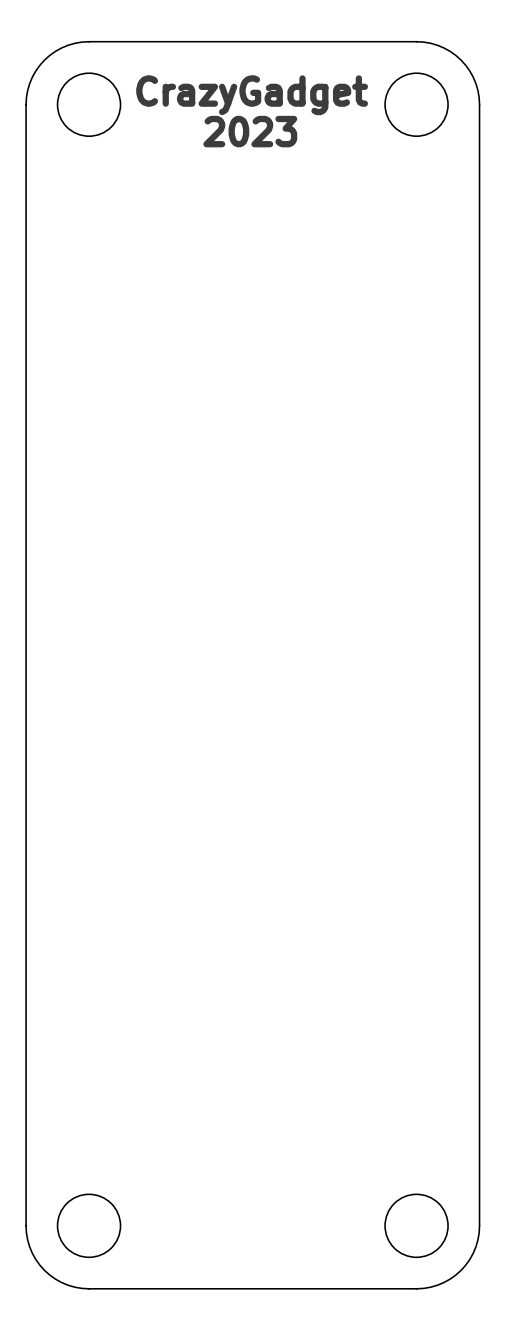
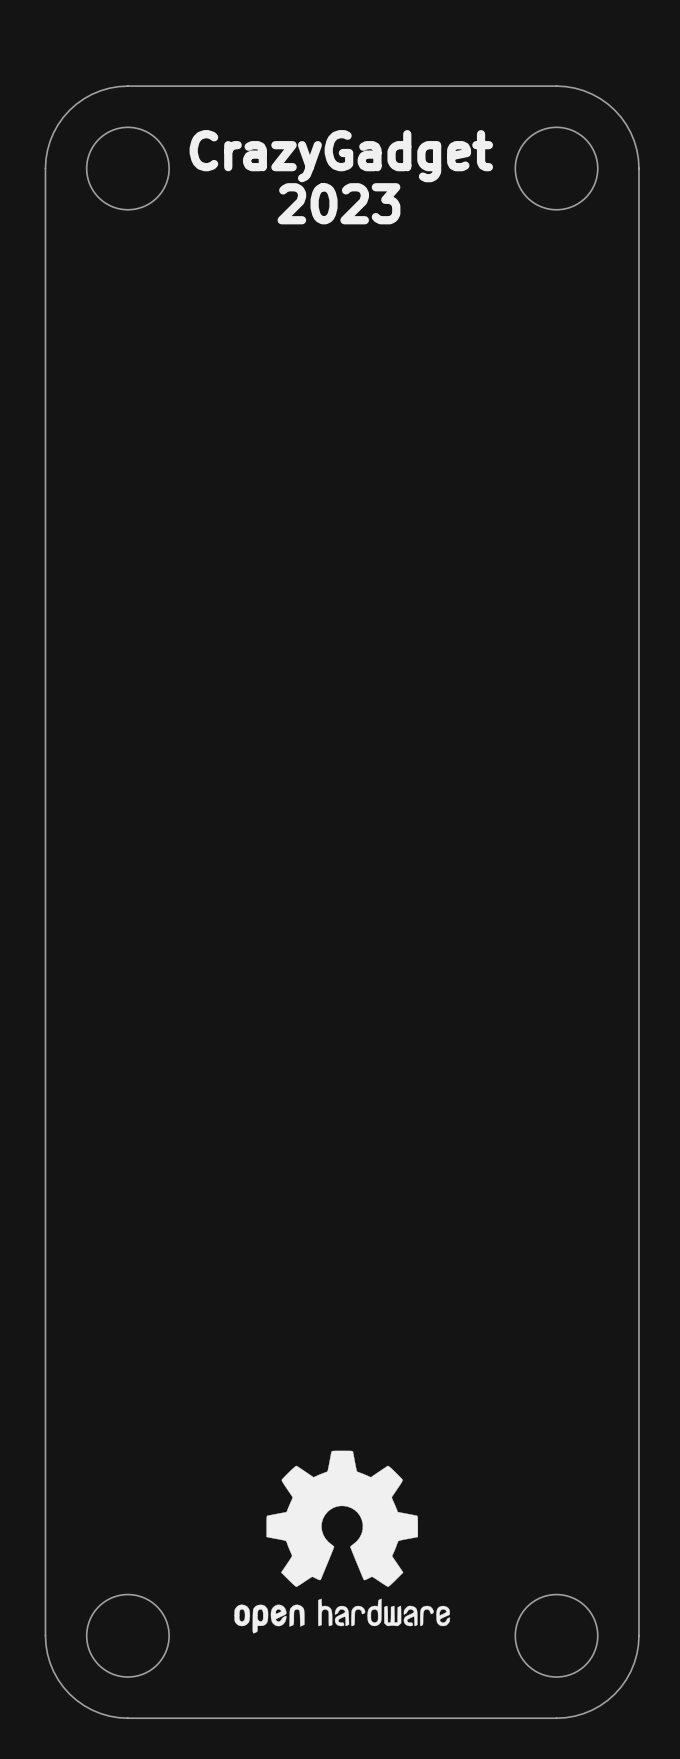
drawing: none -> [234, 1450, 451, 1634]

